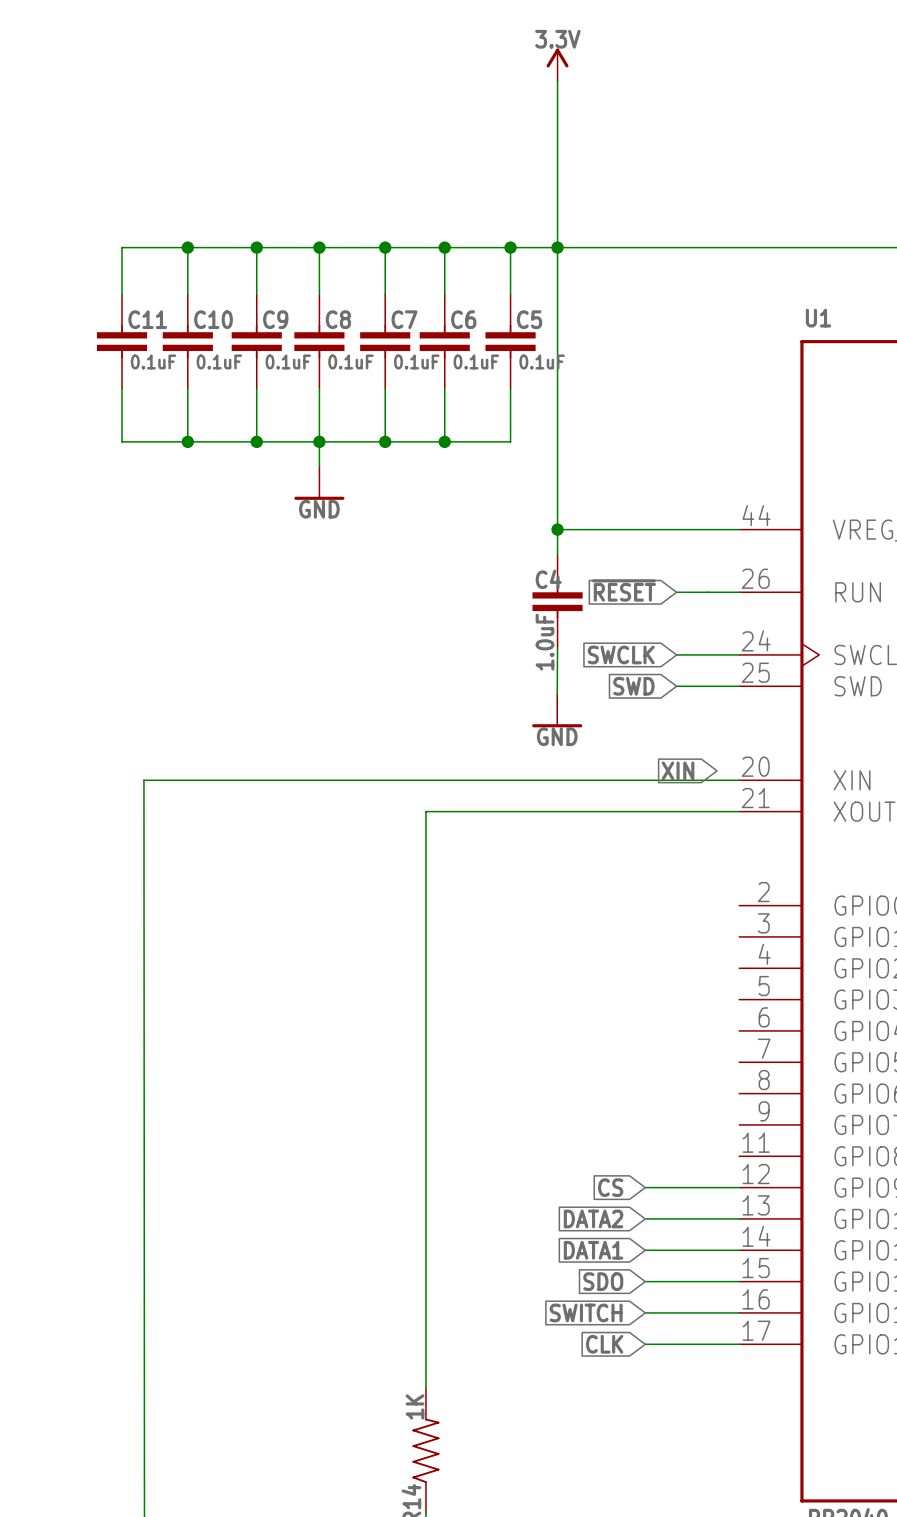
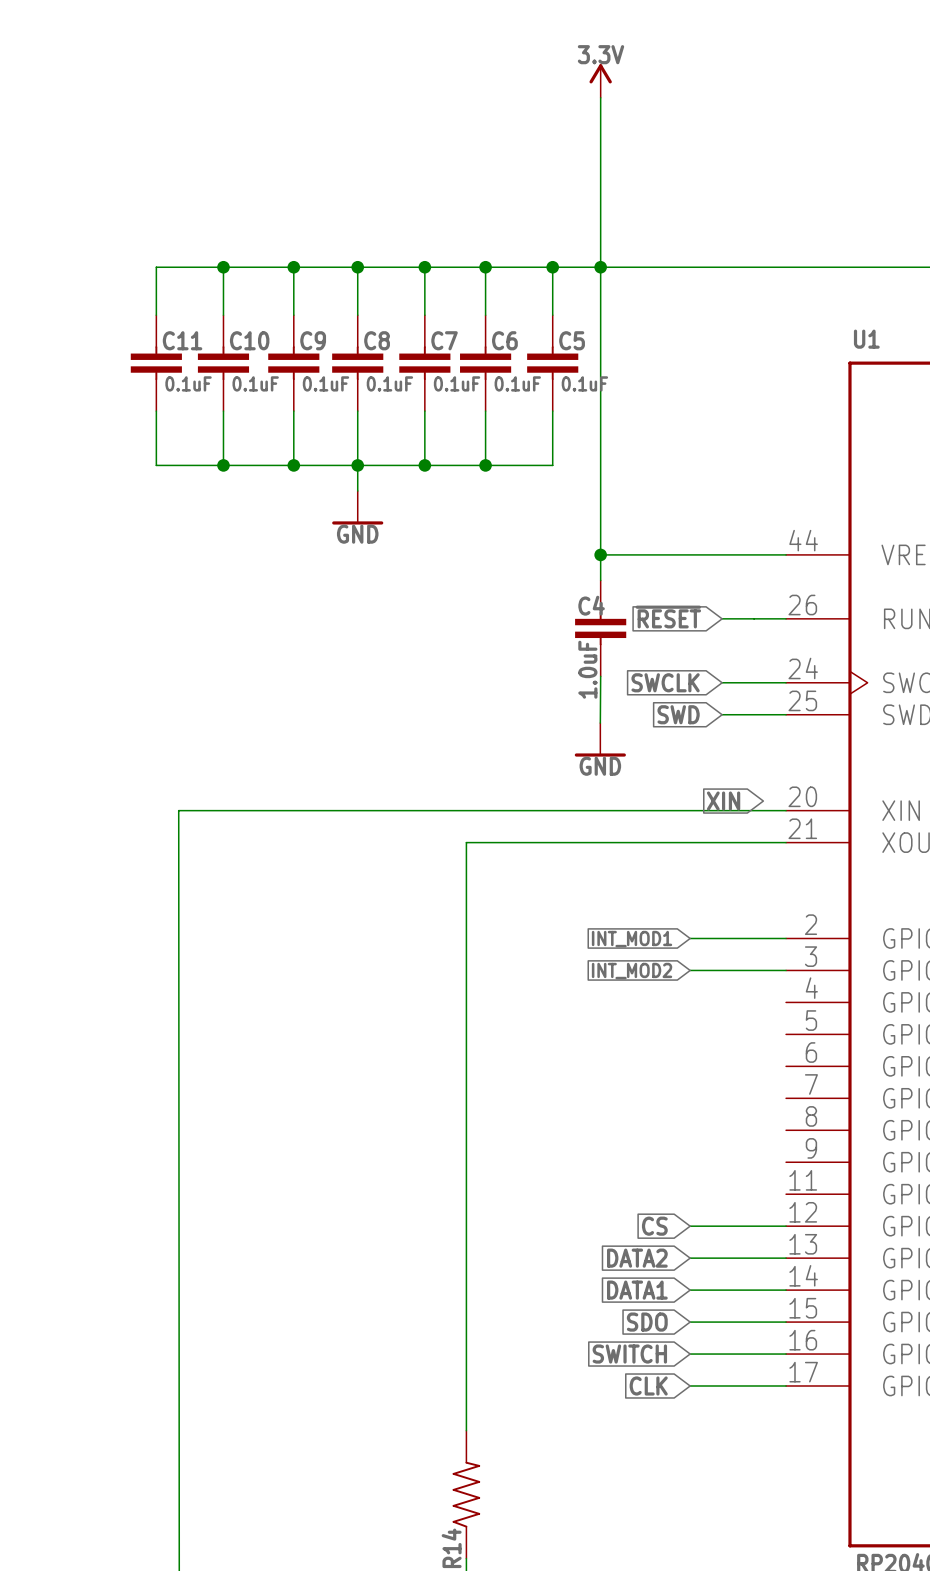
wire: none -> (690, 938) (786, 938)
global label: none -> INT_MOD1 (632, 939)
wire: none -> (690, 970) (786, 970)
global label: none -> INT_MOD2 (632, 971)
R14 value: 1K (414, 1406) -> none

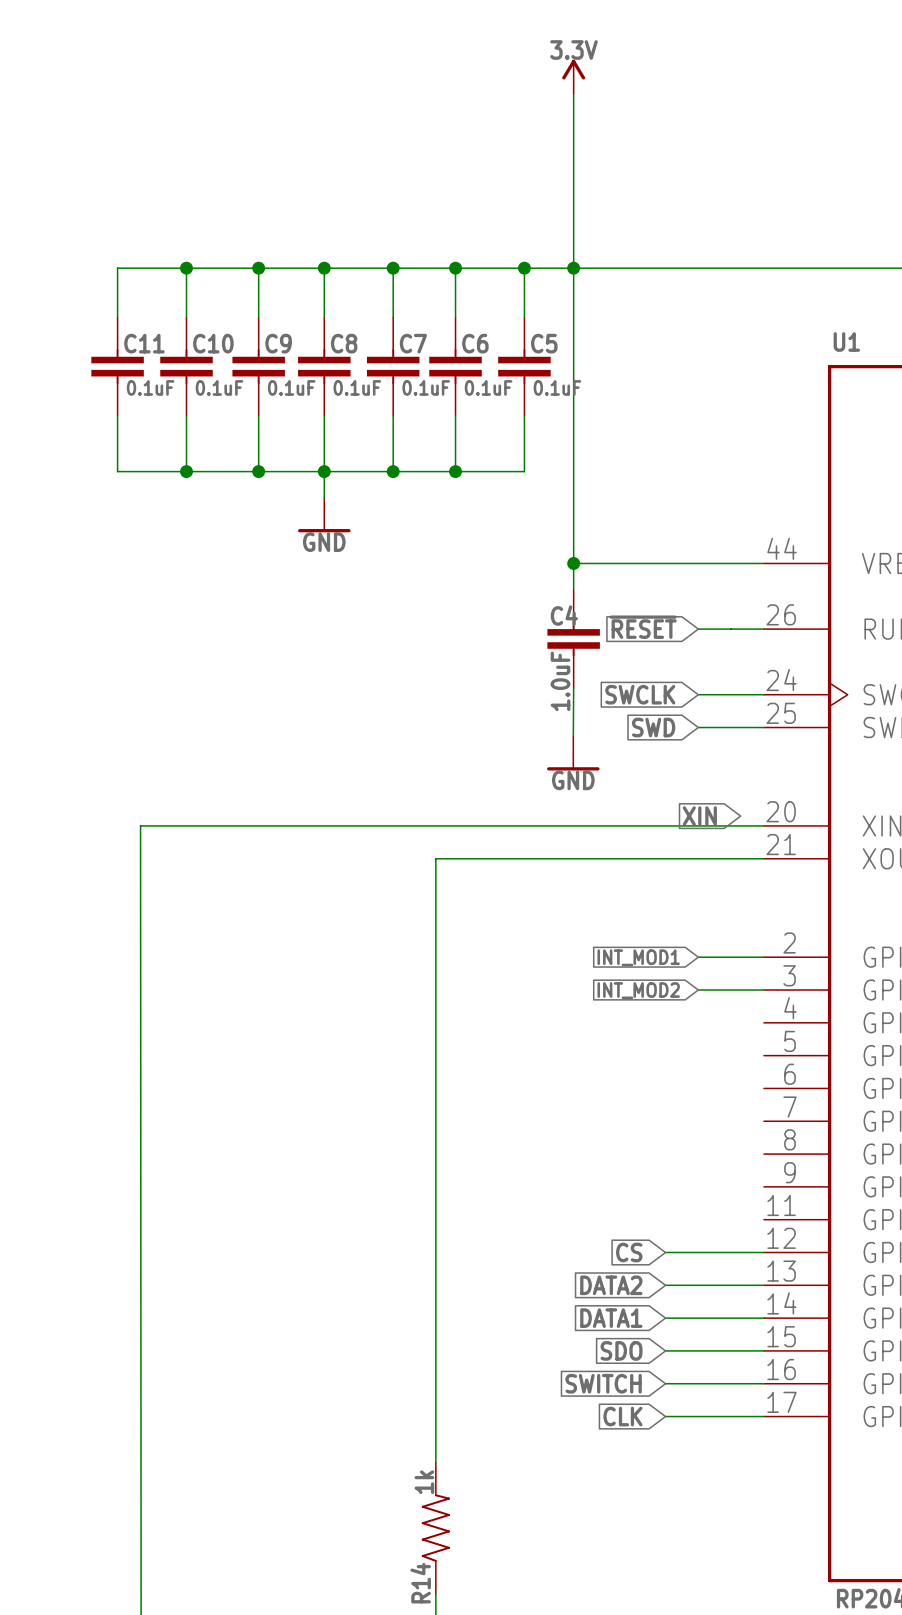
wire: (690, 938) (722, 938) -> none
global label position: INT_MOD1 (632, 939) -> INT_MOD1 (638, 957)
wire: (690, 970) (722, 970) -> none
global label position: INT_MOD2 (632, 971) -> INT_MOD2 (638, 990)
R14 value: none -> 1k (424, 1482)

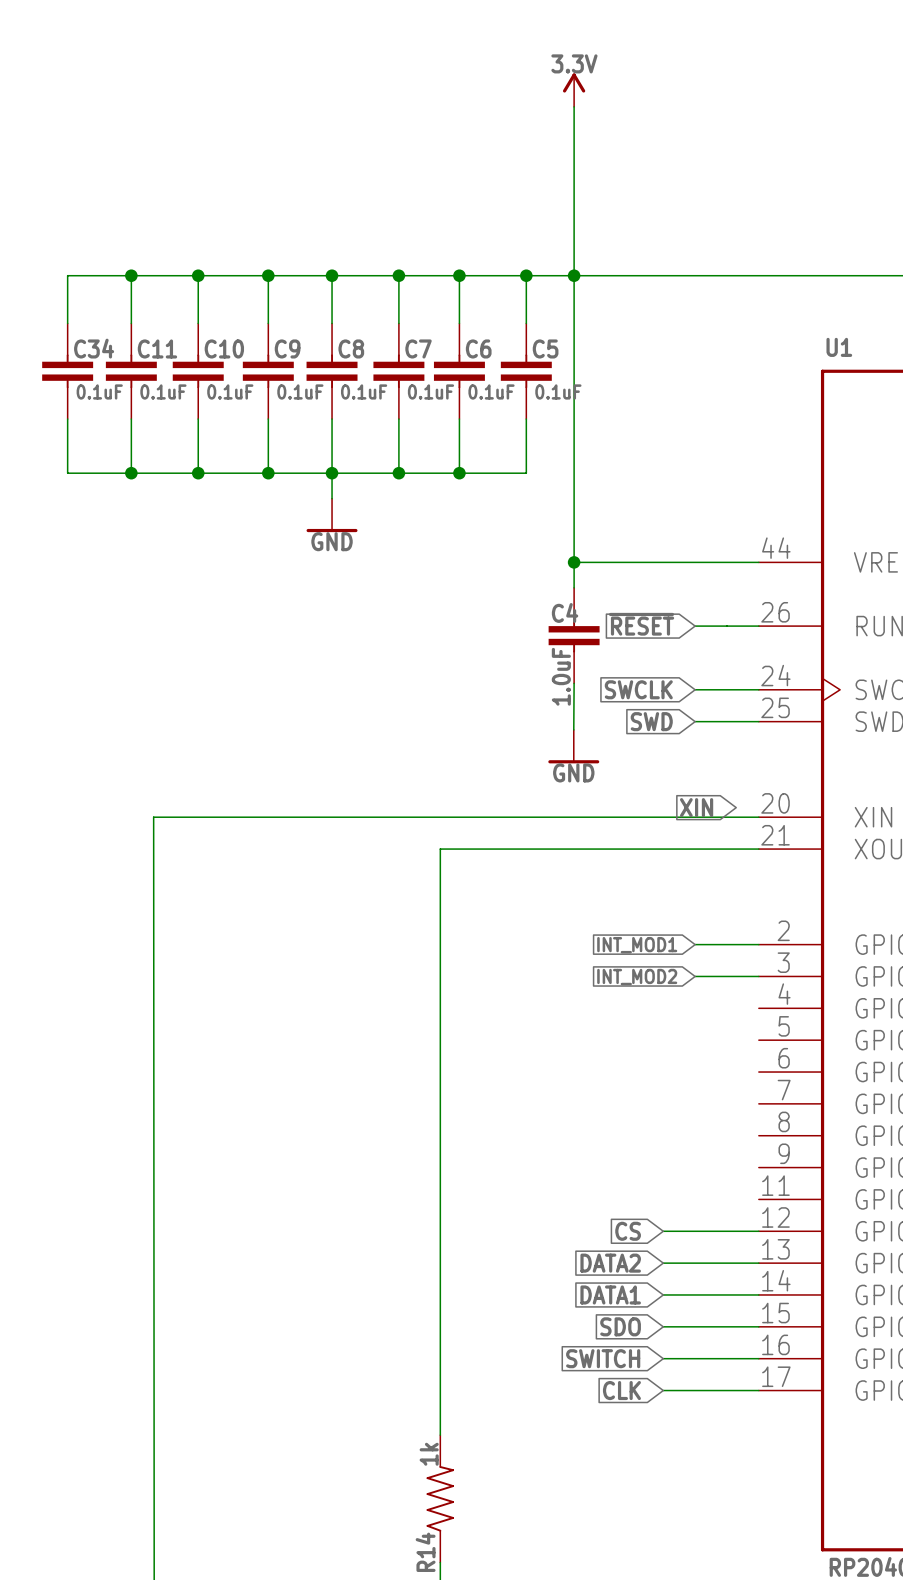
wire: none -> (131, 275) (67, 275) (67, 323)
junction: none -> (131, 275)
C34: none -> 0.1uF (67, 371)
wire: none -> (67, 419) (67, 473) (131, 473)
junction: none -> (131, 473)

